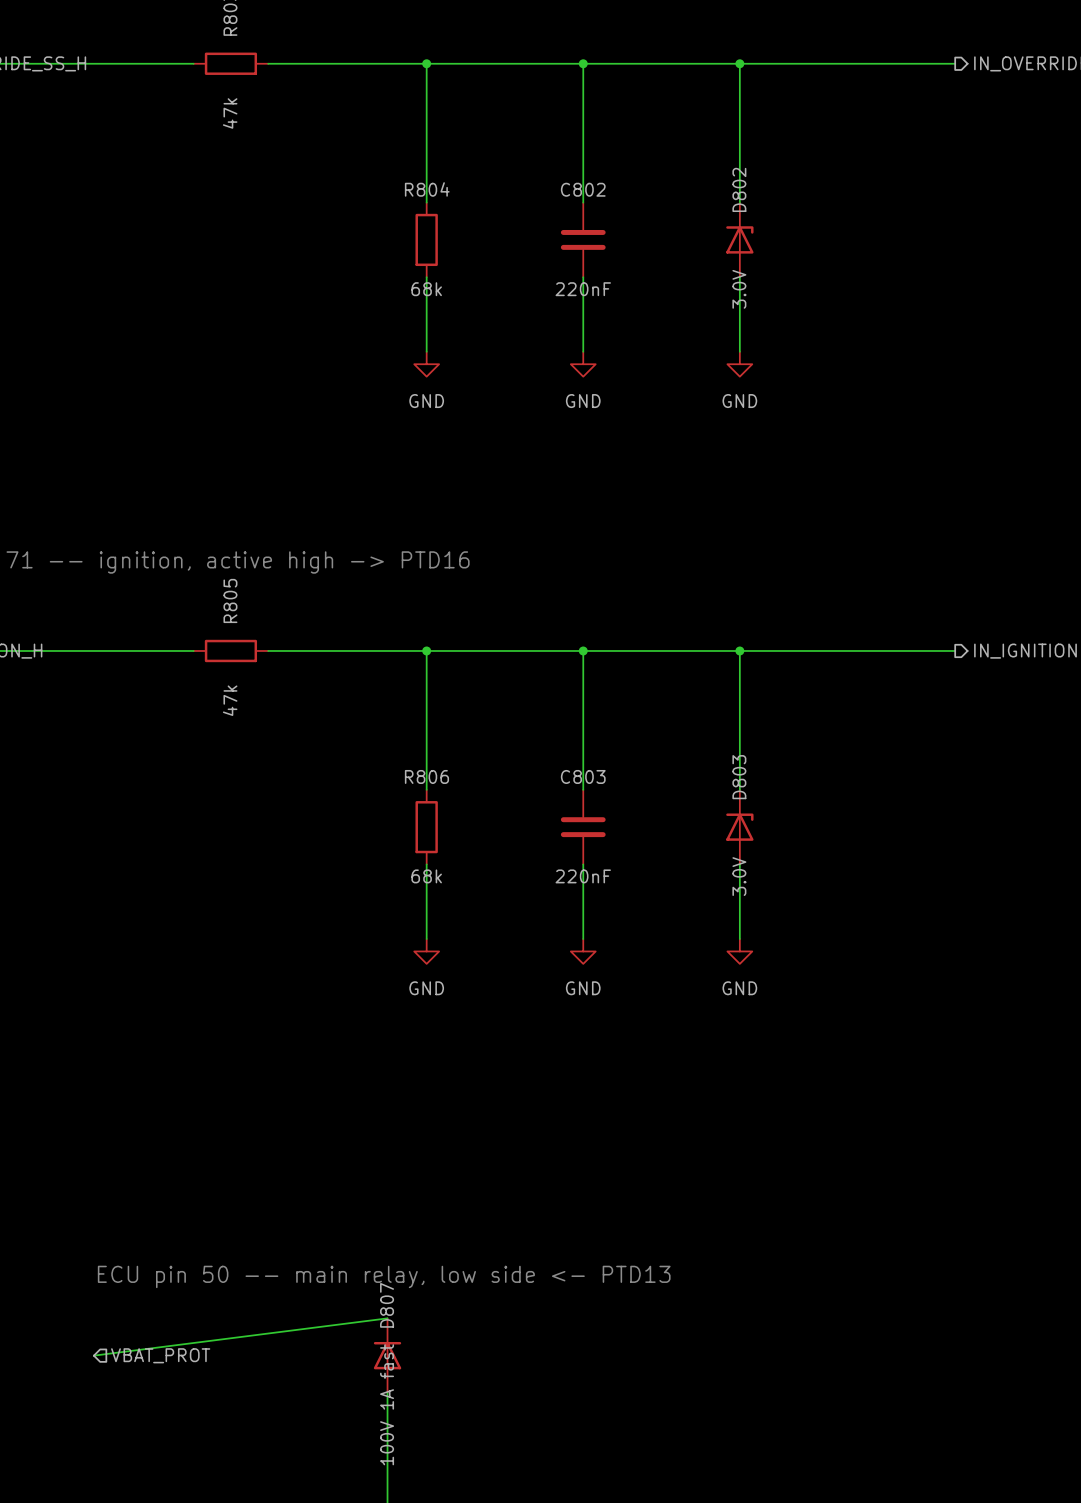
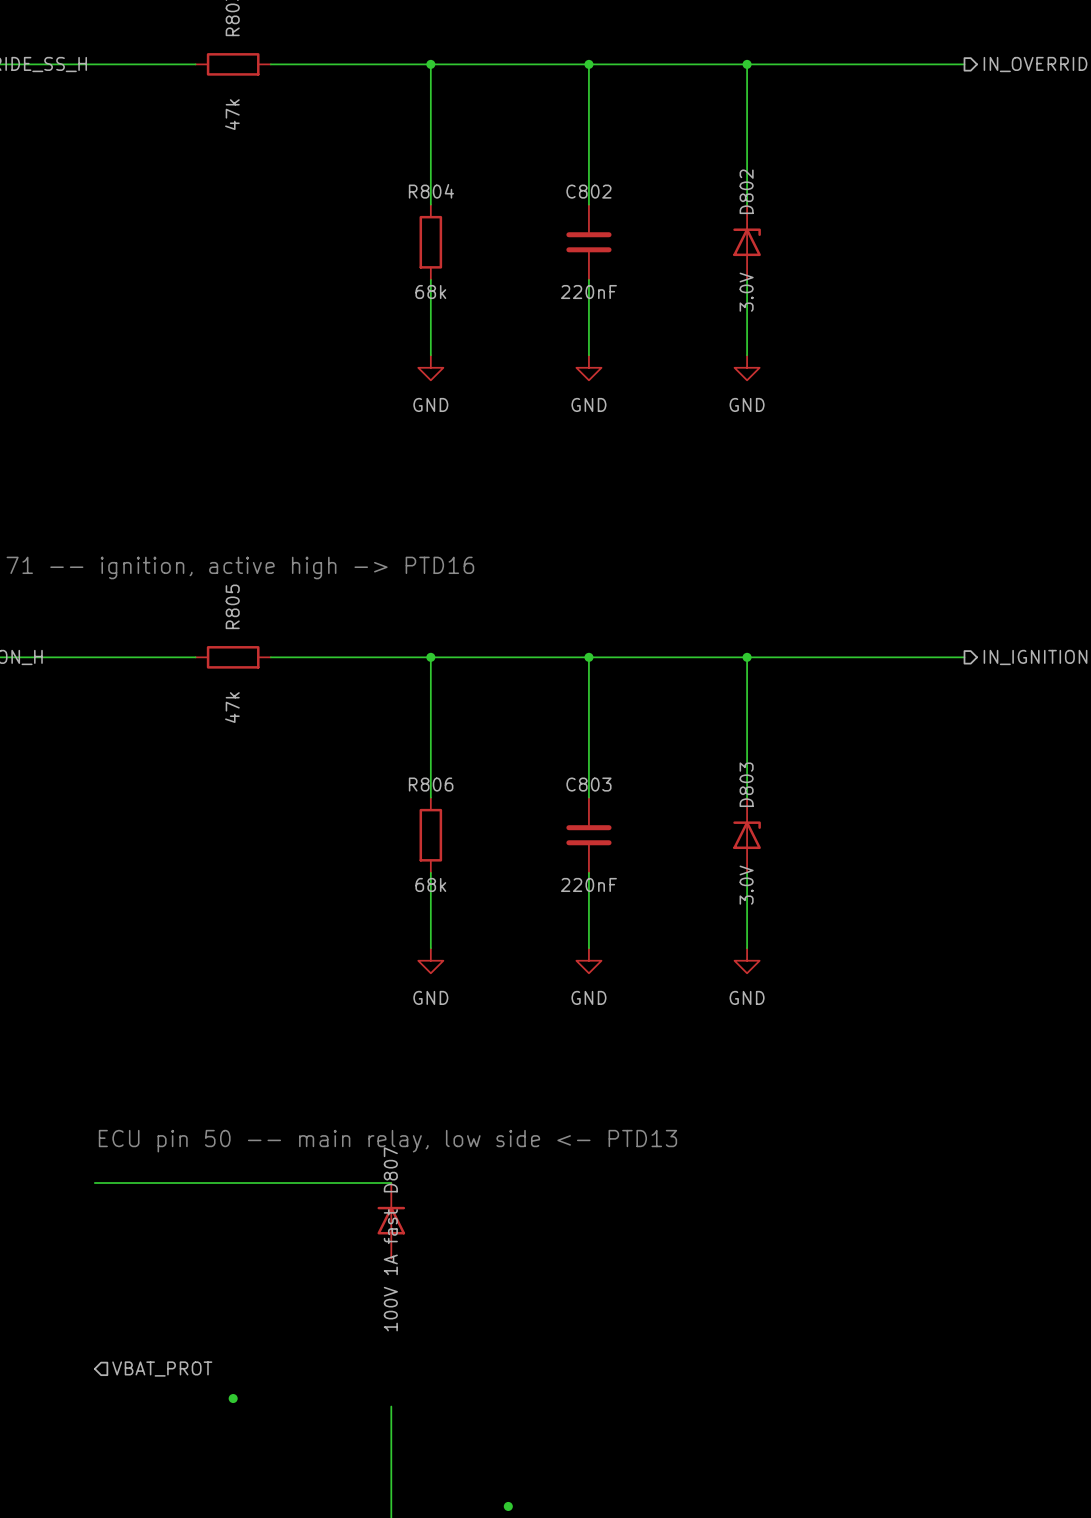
wire: none -> (94, 1182) (391, 1182)
text position: ECU pin 50 -- main relay, low side <- PTD13 (384, 1276) -> ECU pin 50 -- main relay, low side <- PTD13 (387, 1141)
wire: (387, 1318) (93, 1355) -> none
D807 position: (387, 1355) -> (391, 1220)
junction: none -> (233, 1398)
junction: none -> (508, 1506)

